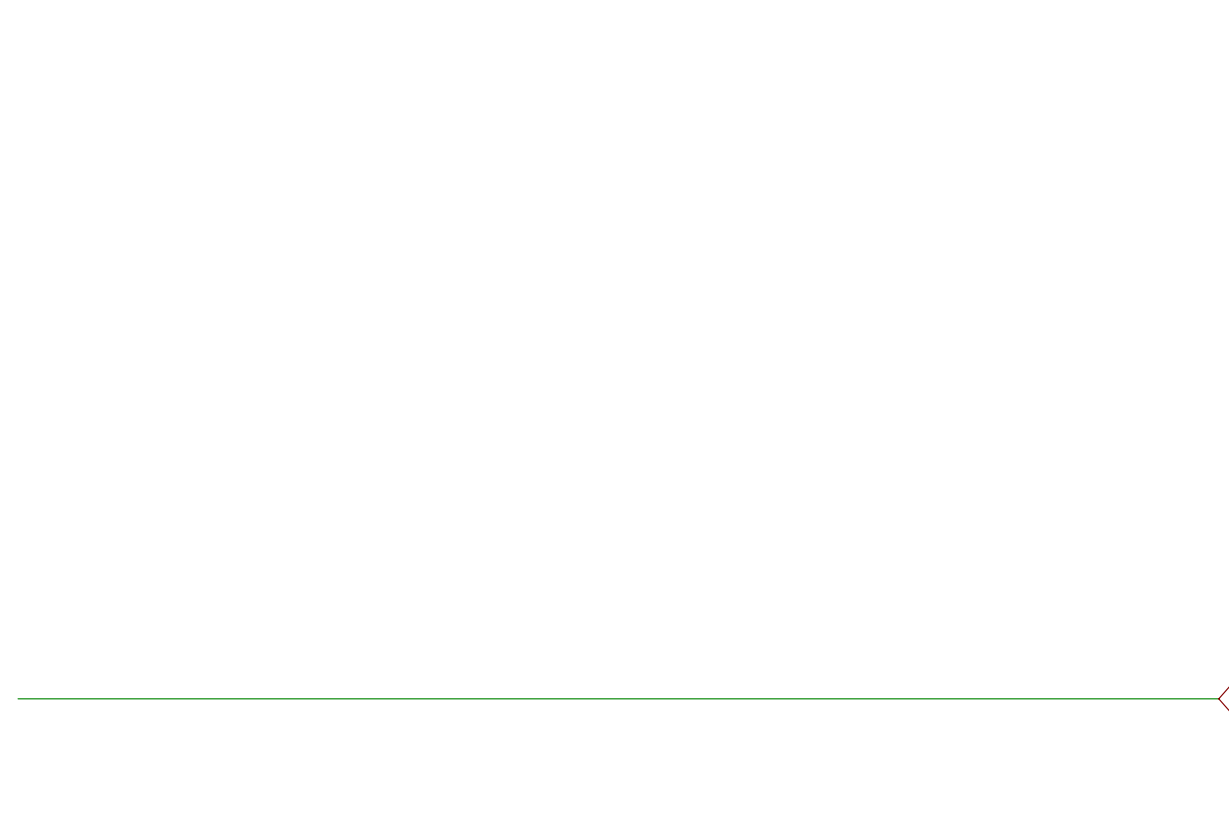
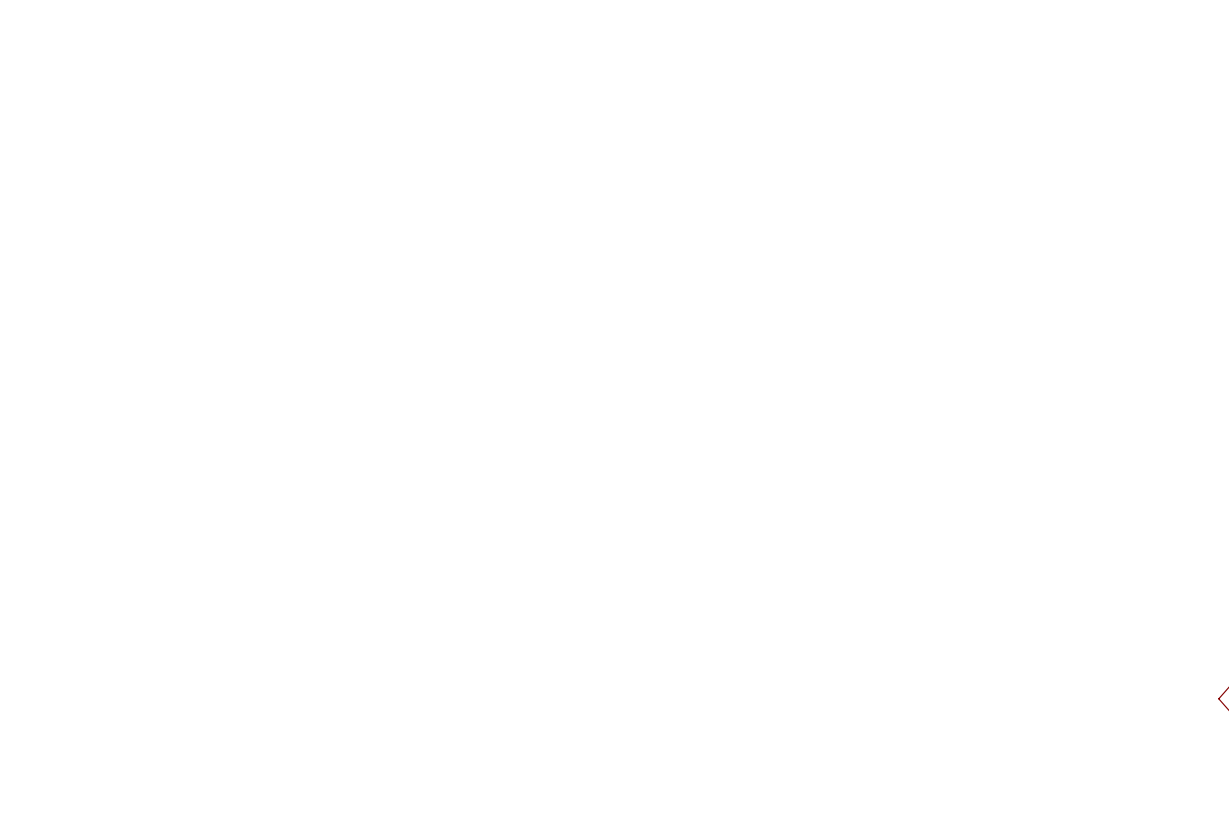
wire: (18, 698) (1218, 698) -> none

